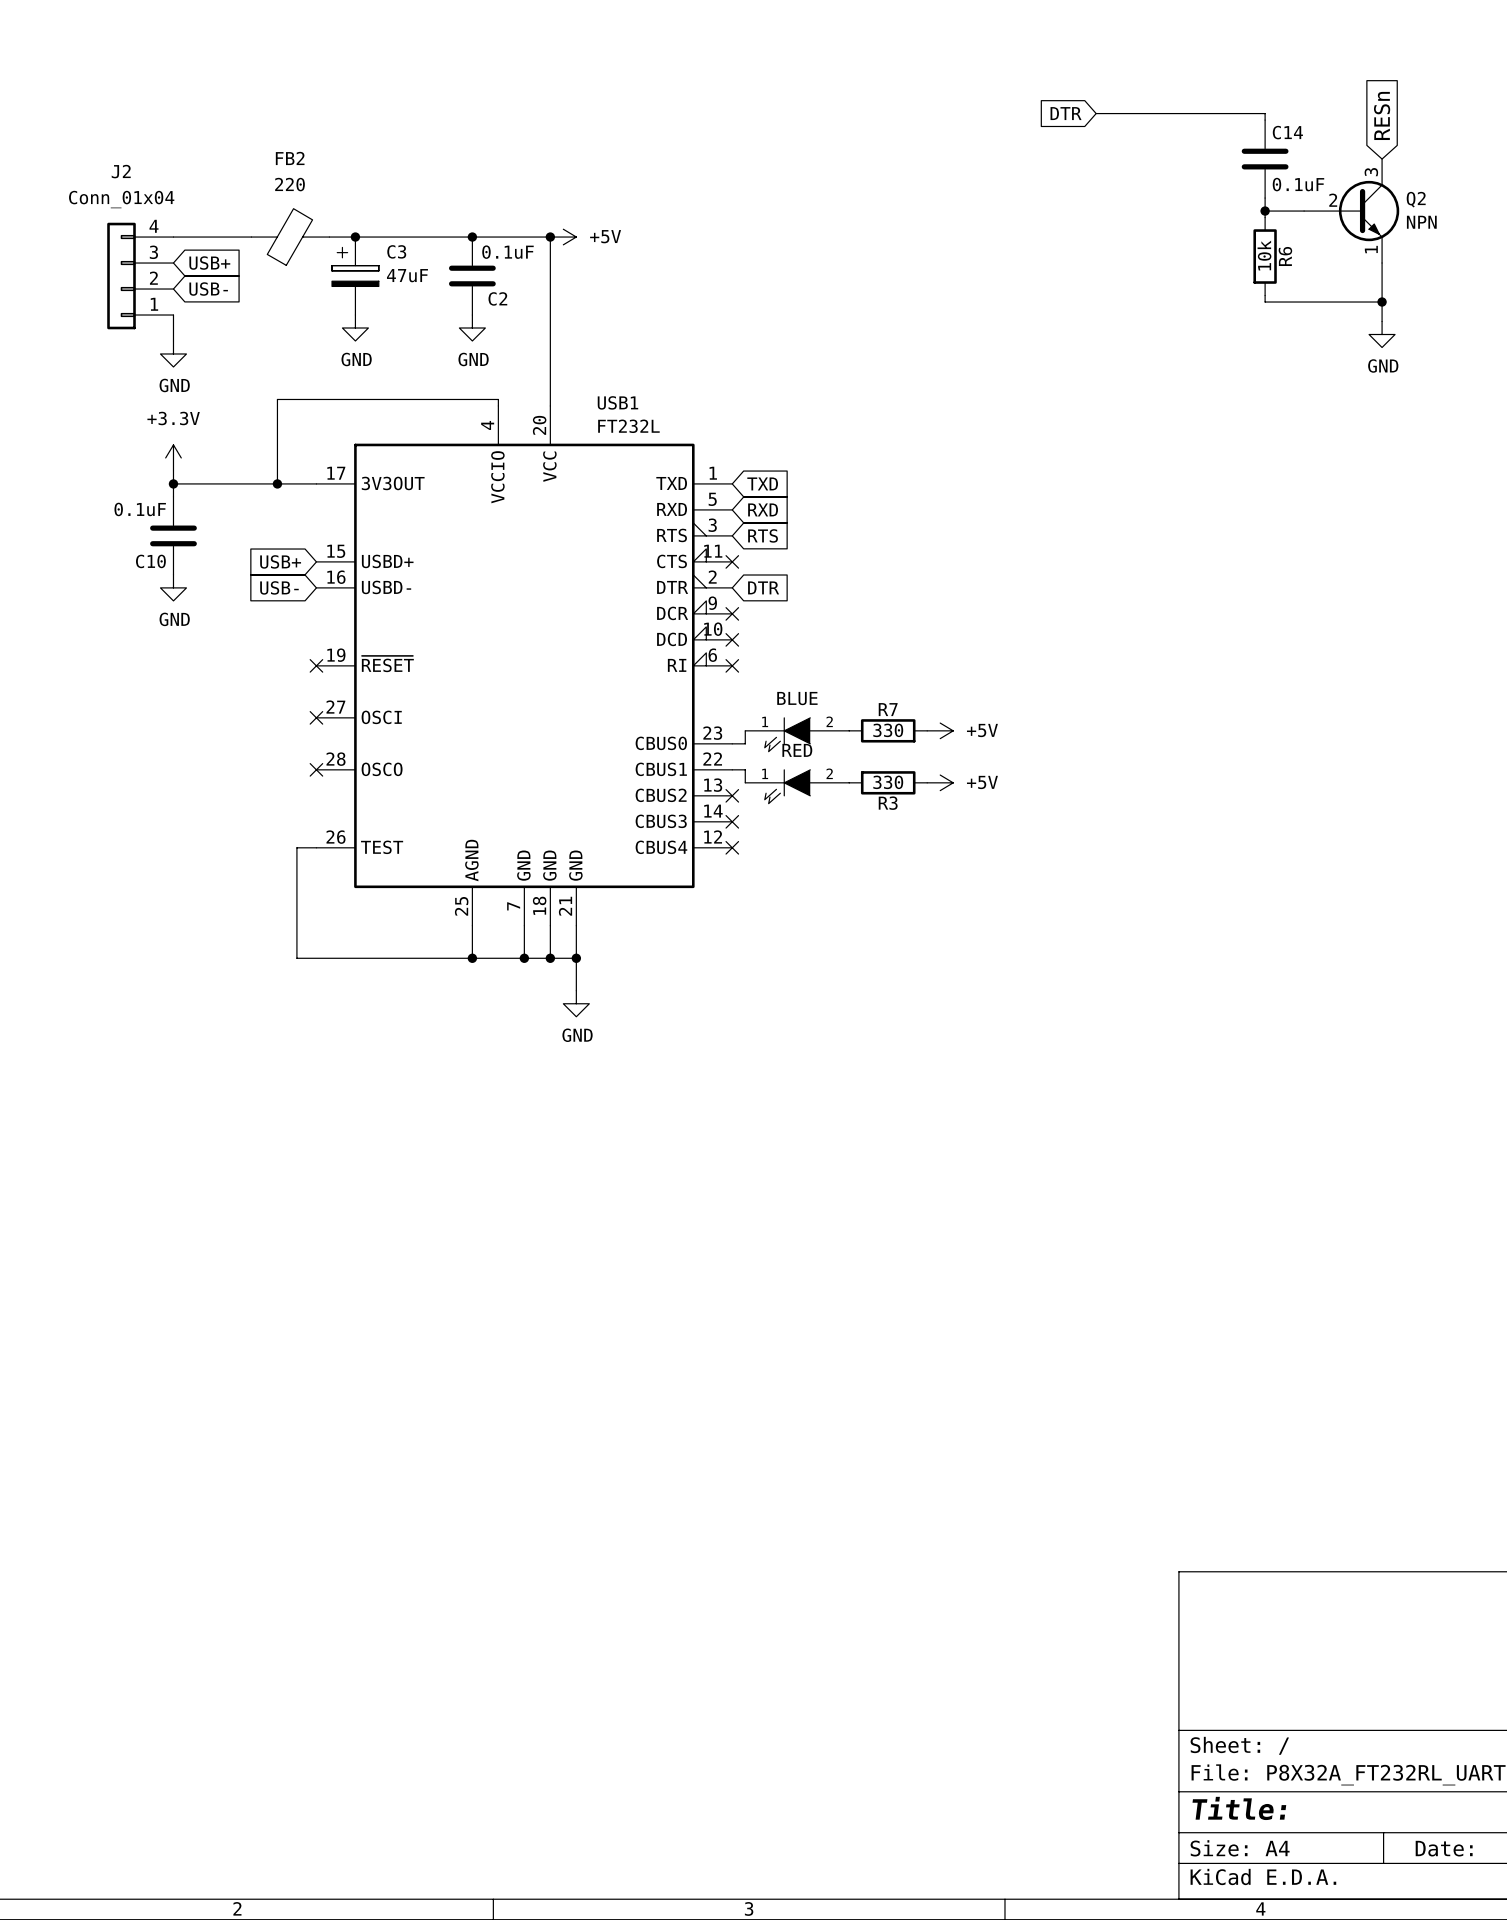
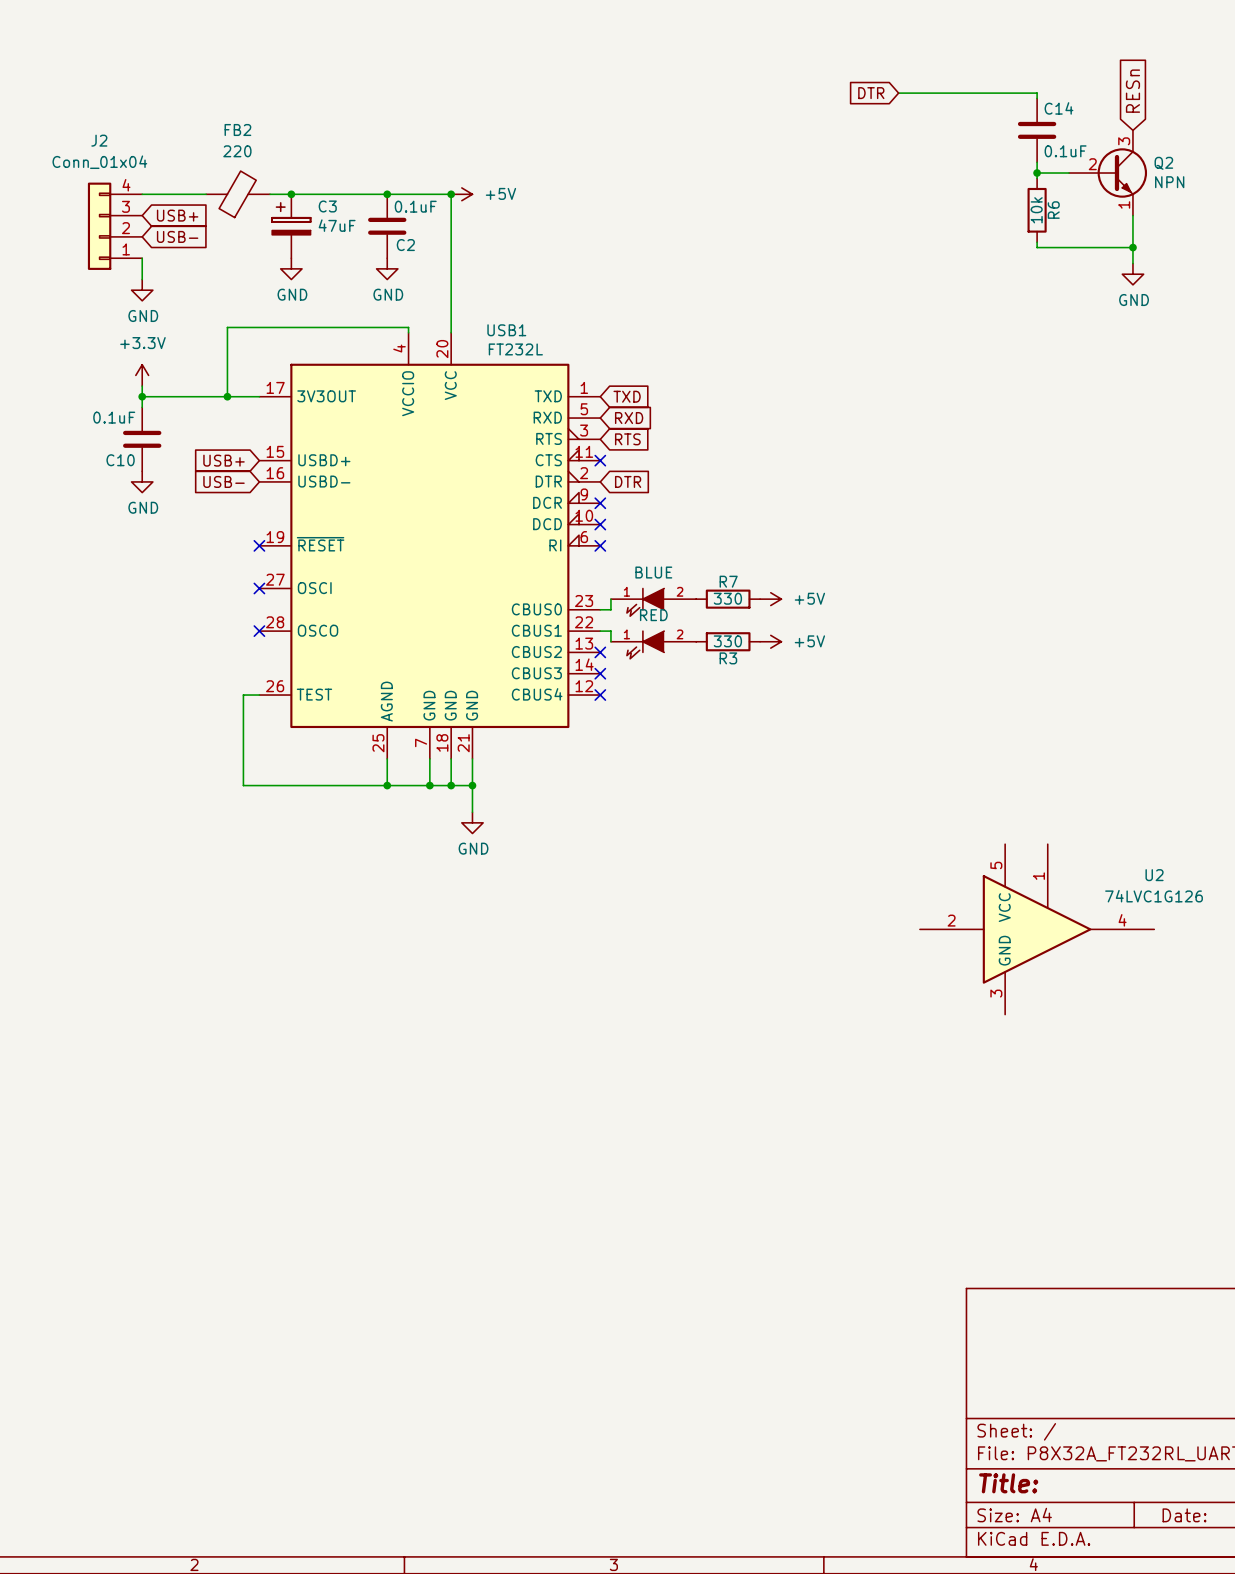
U2: none -> 74LVC1G126 (1037, 929)

